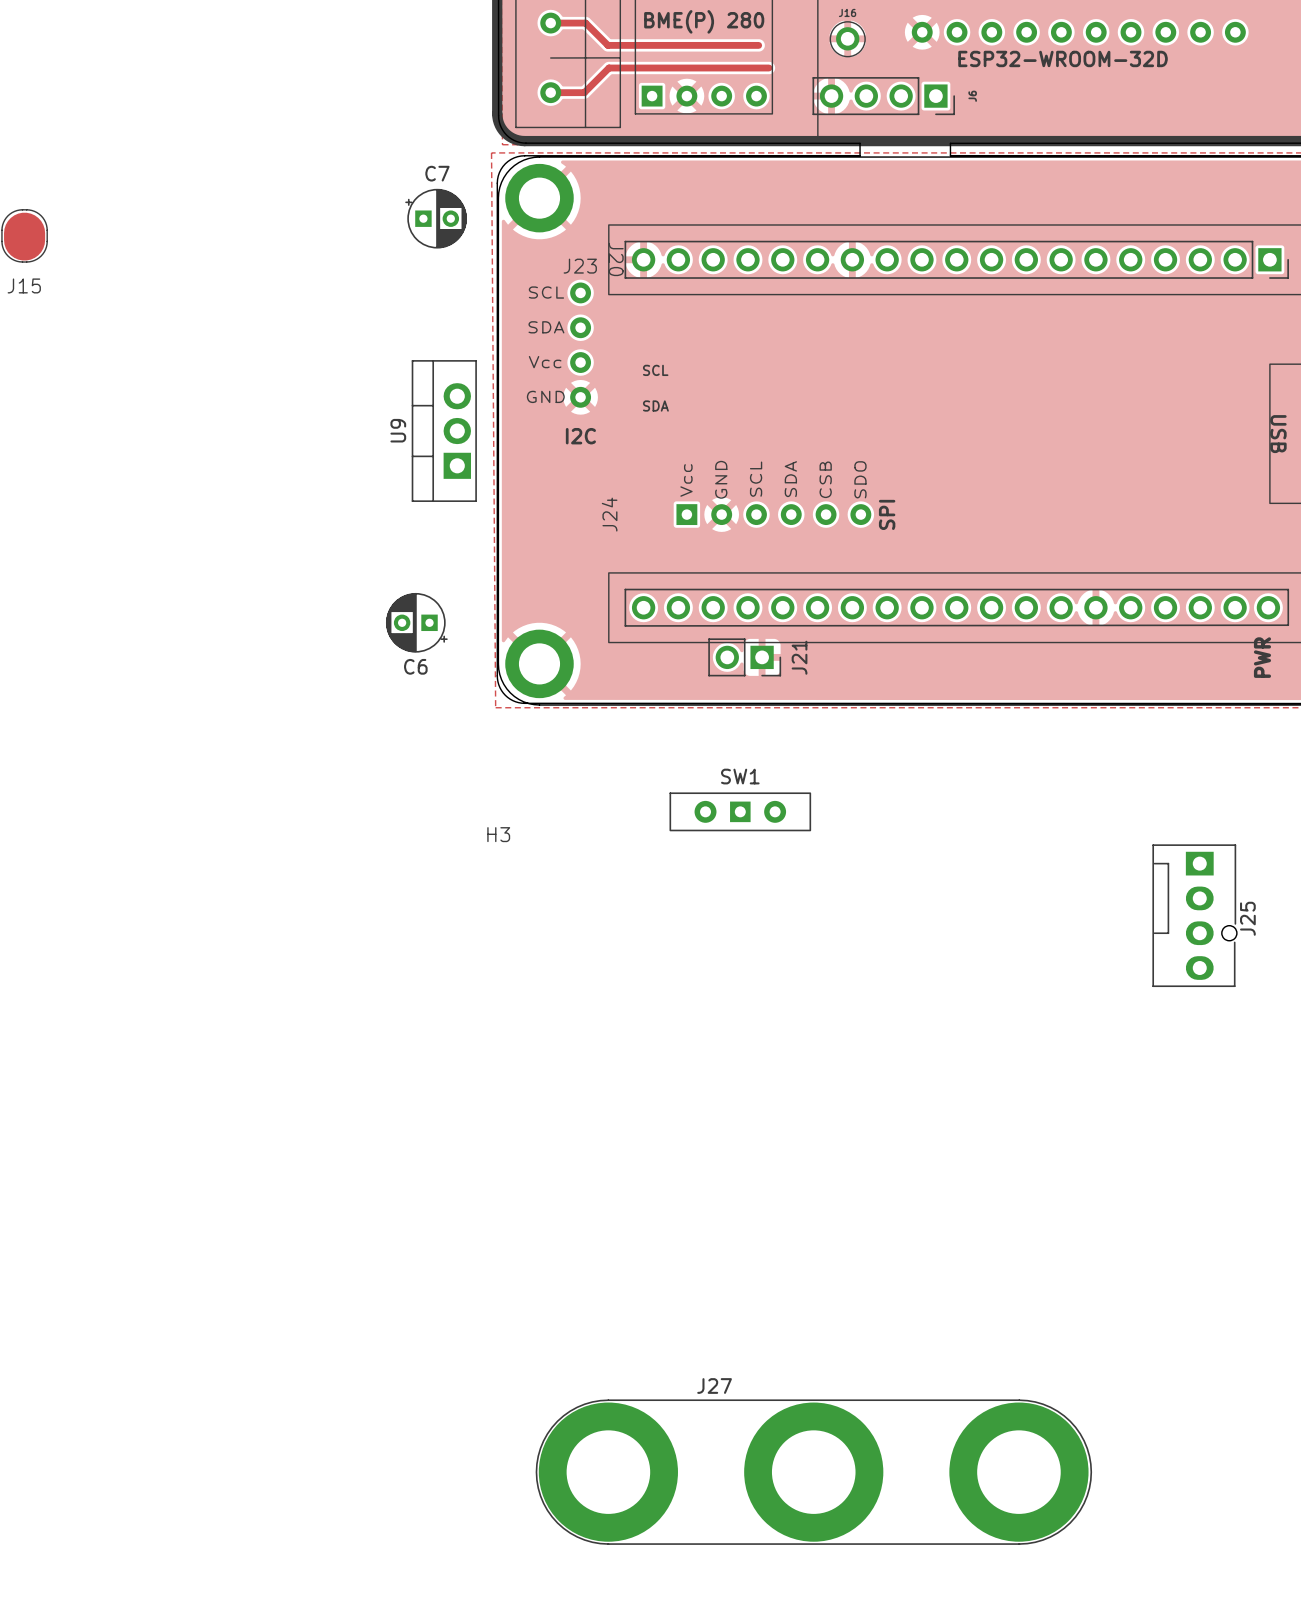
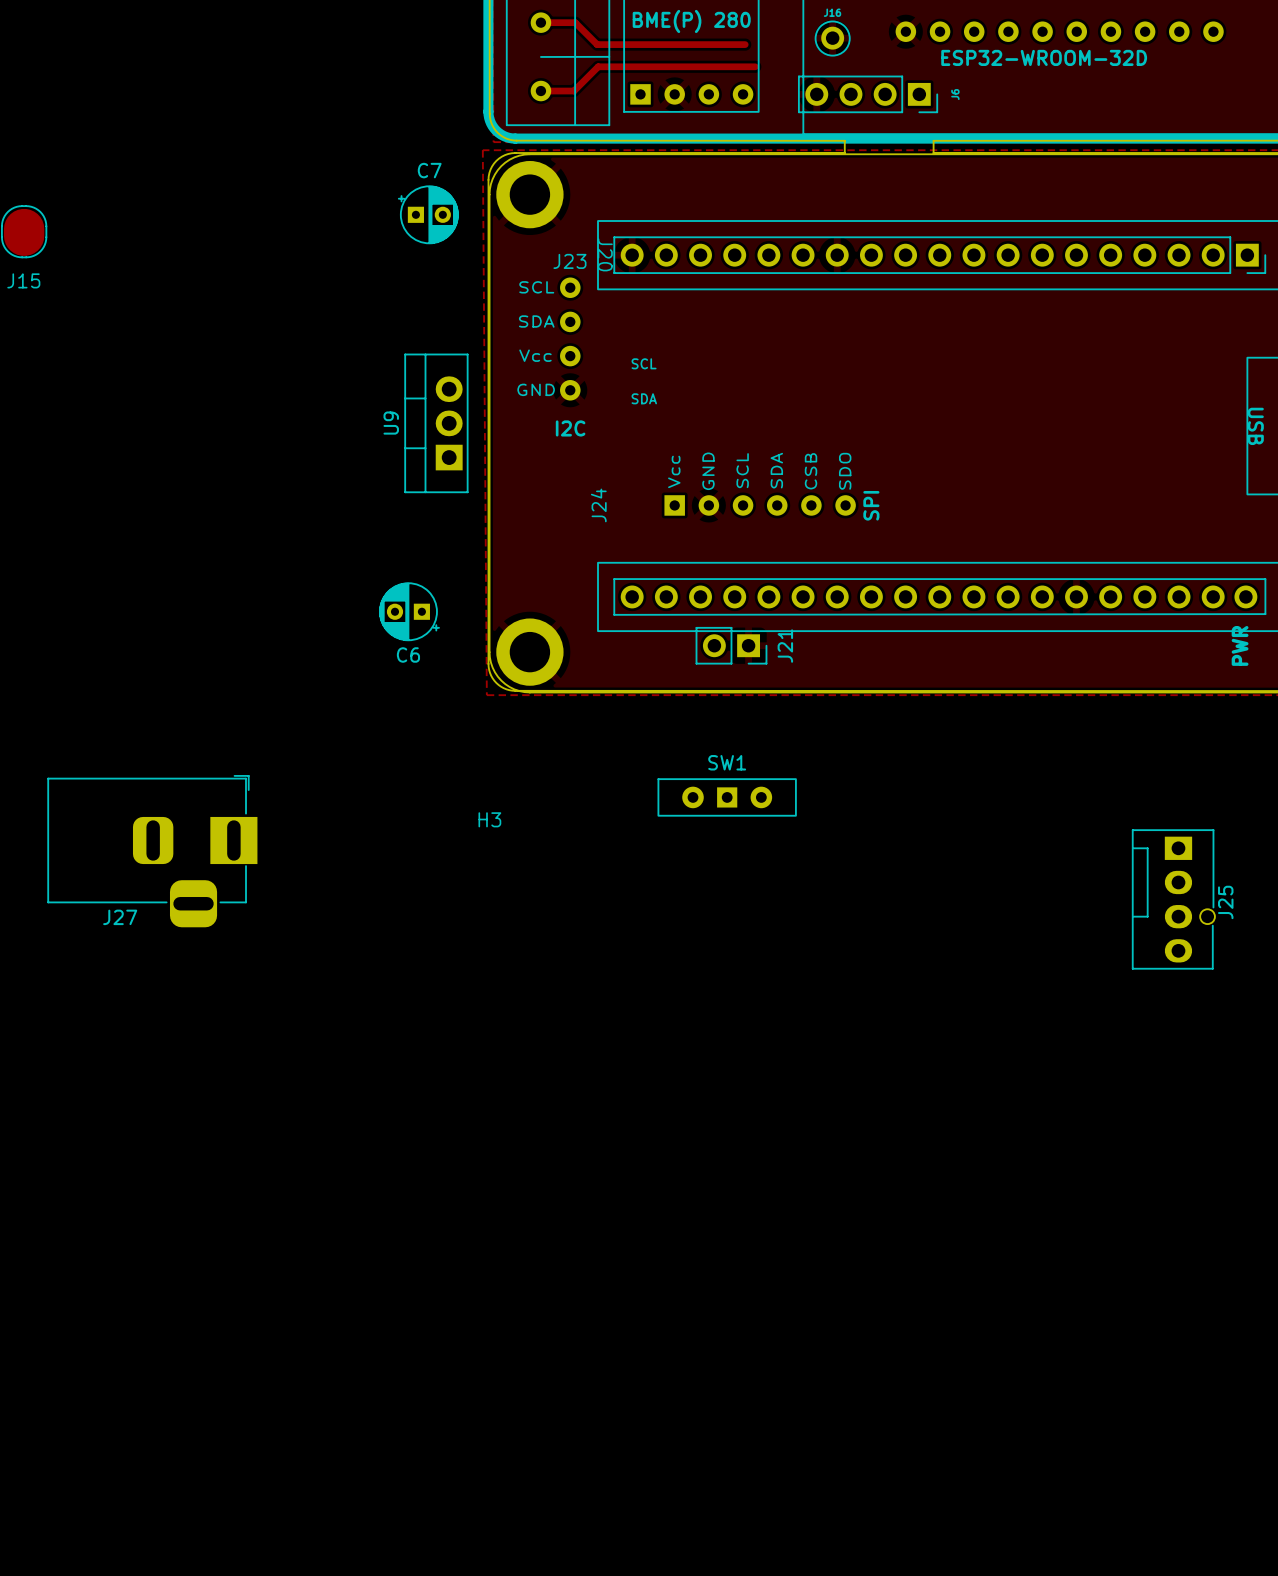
J27 name position: J27 (714, 1386) -> J27 (120, 917)
J27 footprint: [535, 1399, 1093, 1545] -> [47, 775, 258, 928]

